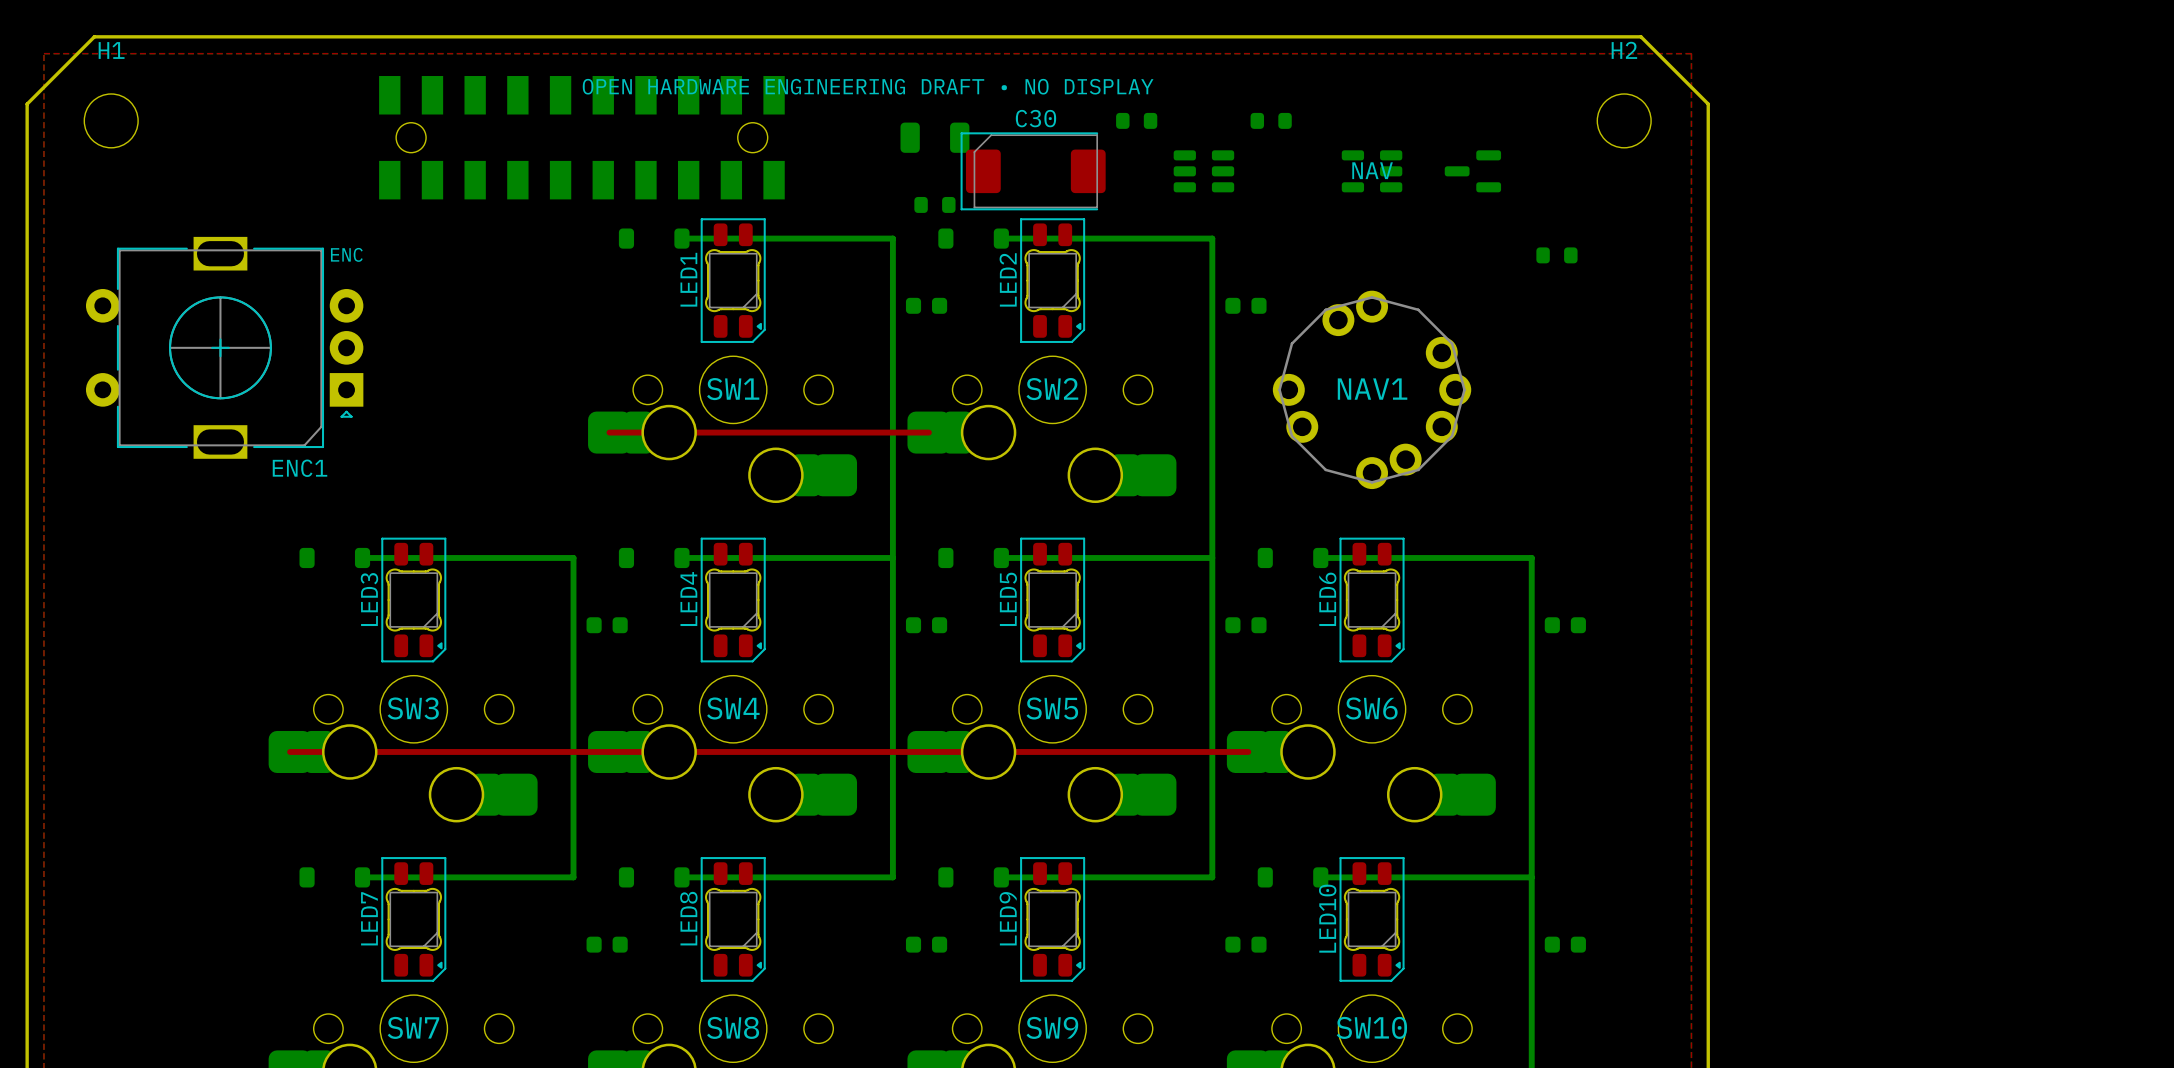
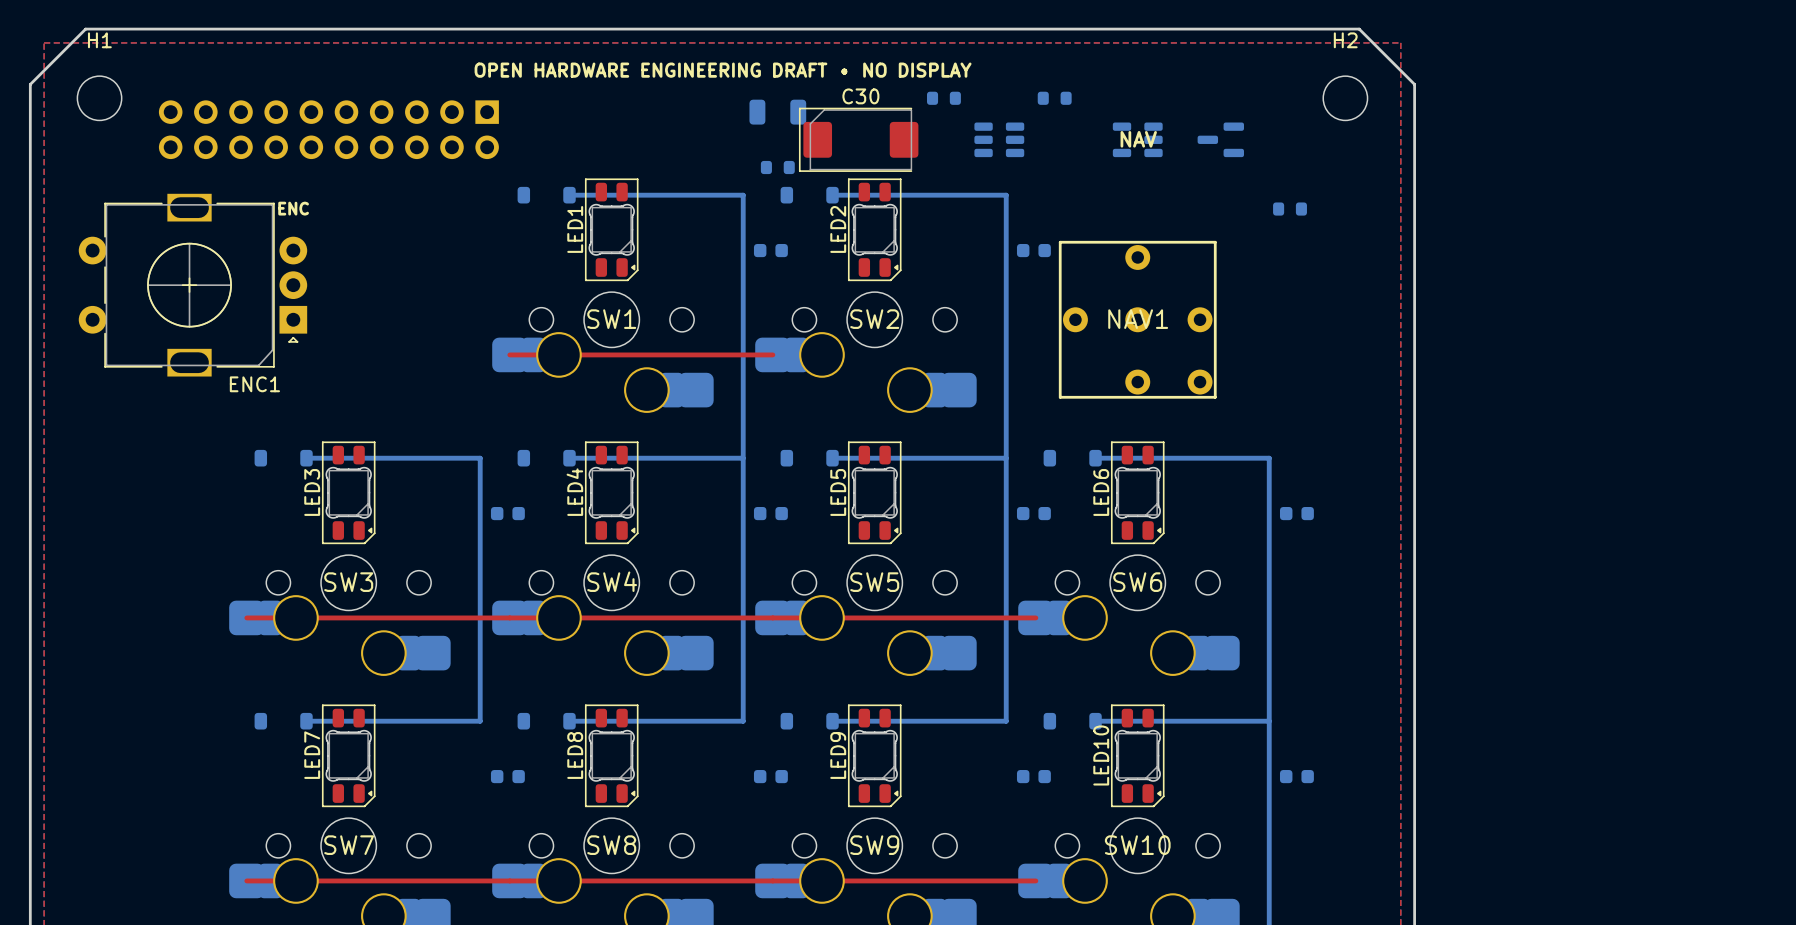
part: (581, 137) -> none
part: none -> (328, 129)
NAV1 footprint: [1272, 290, 1472, 490] -> [1058, 240, 1217, 399]

